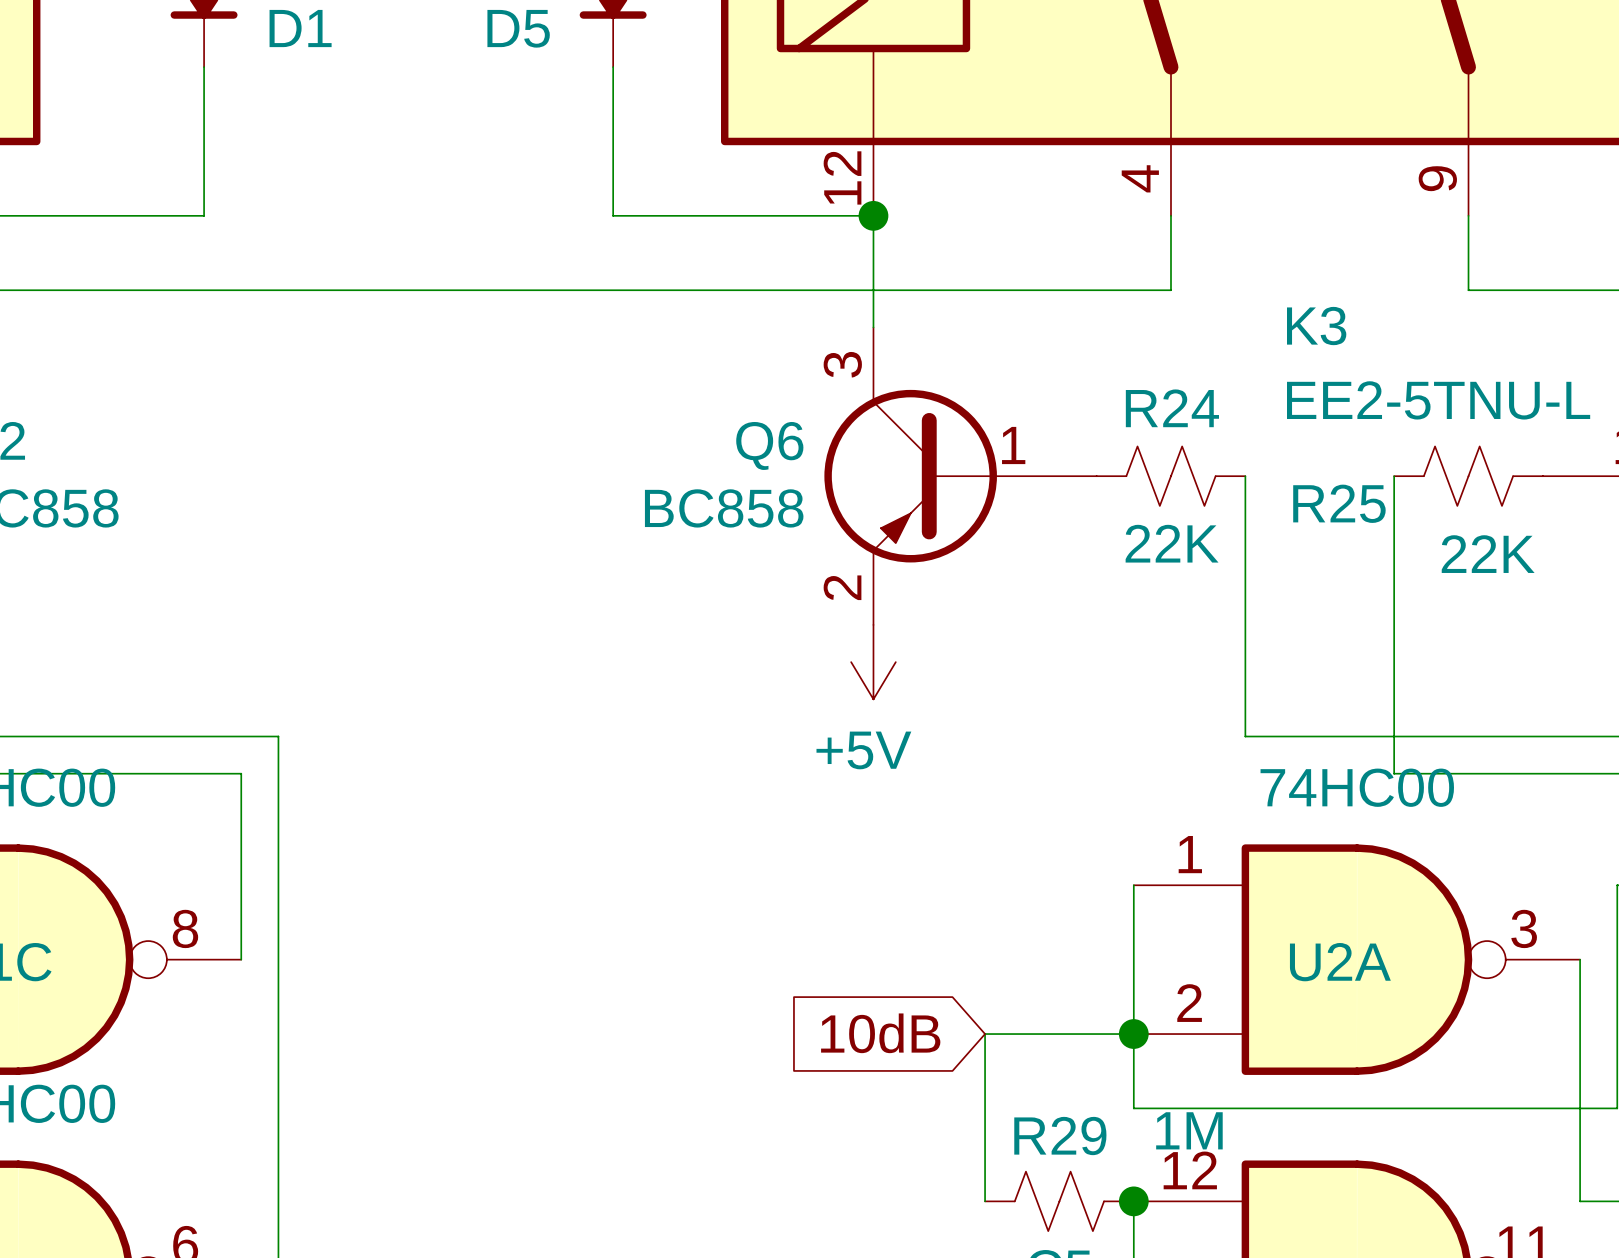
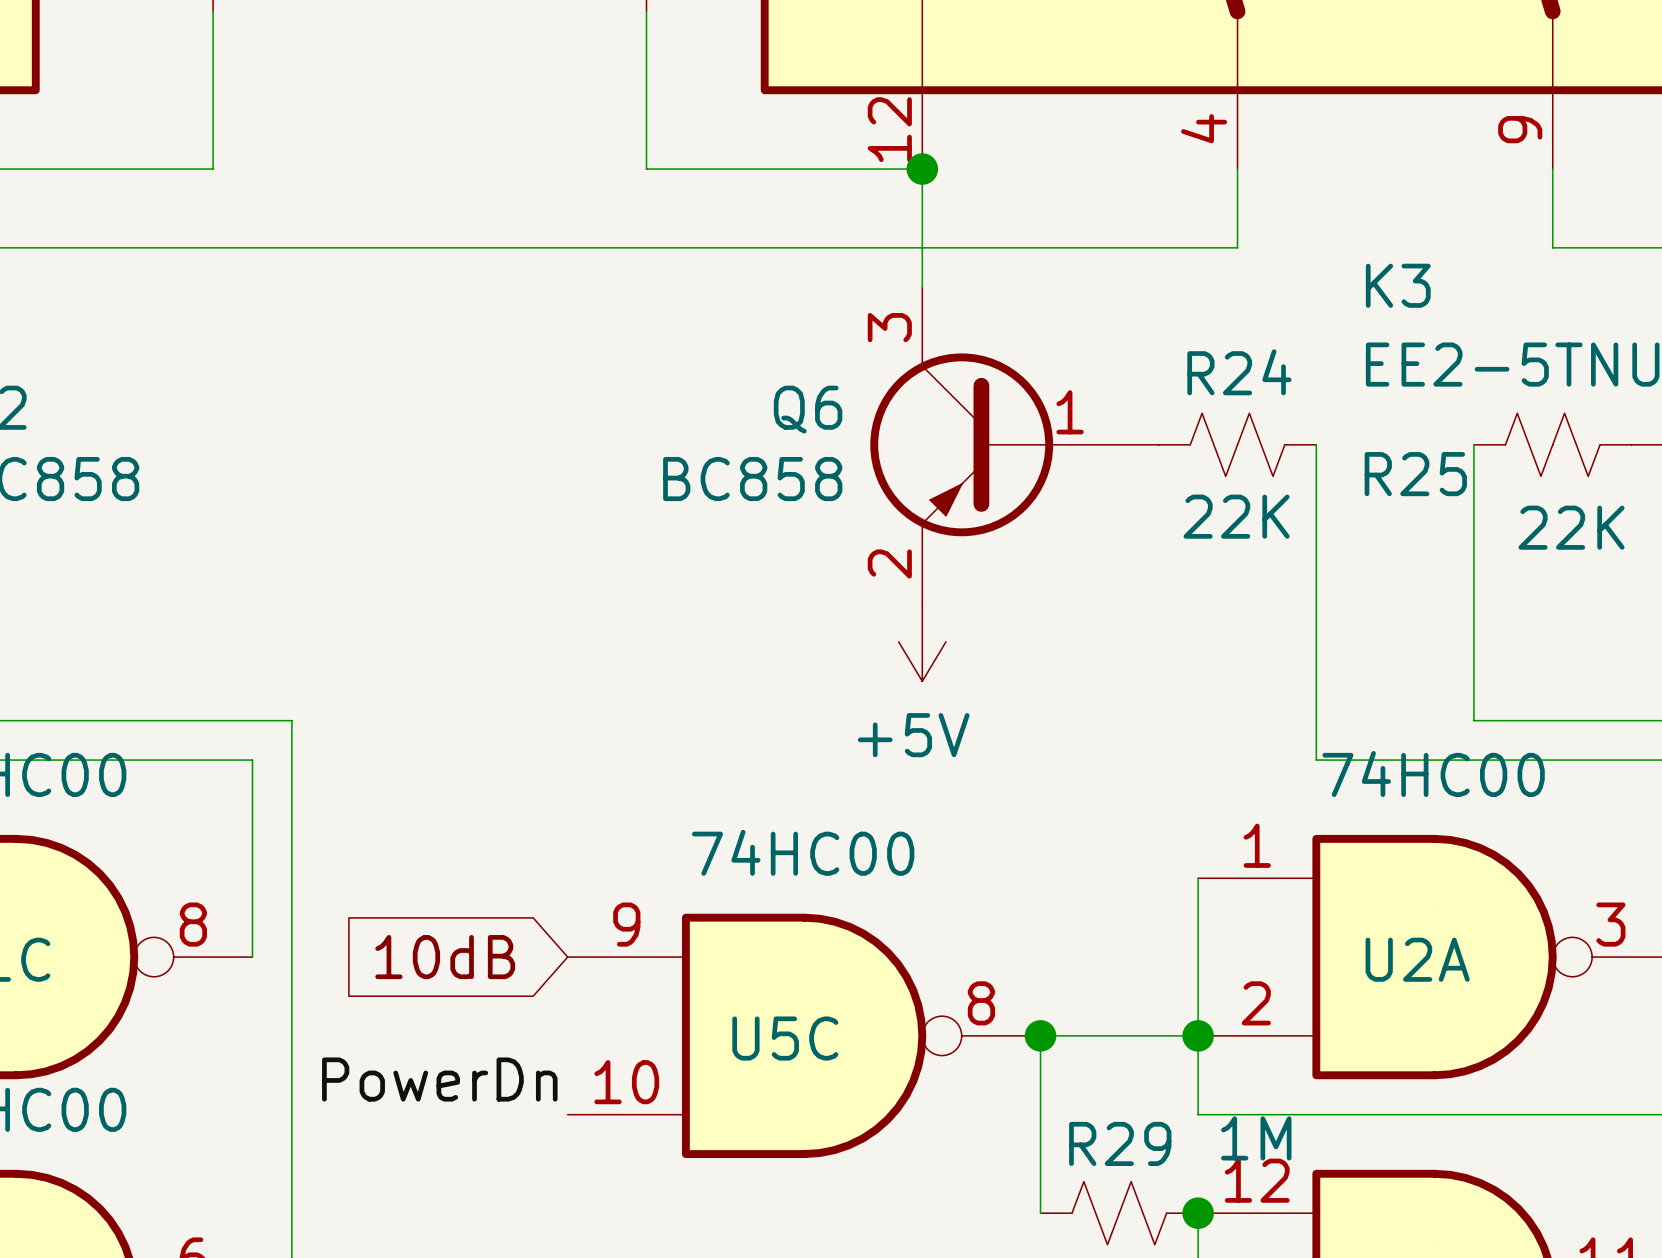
wire: (1245, 736) (1394, 736) (1394, 773) -> (1316, 720) (1316, 760) (1473, 760)
global label position: 10dB (880, 1033) -> 10dB (445, 957)
U5C: none -> 74HC00 (804, 1035)
junction: none -> (1040, 1035)
label: none -> PowerDn (439, 1079)

